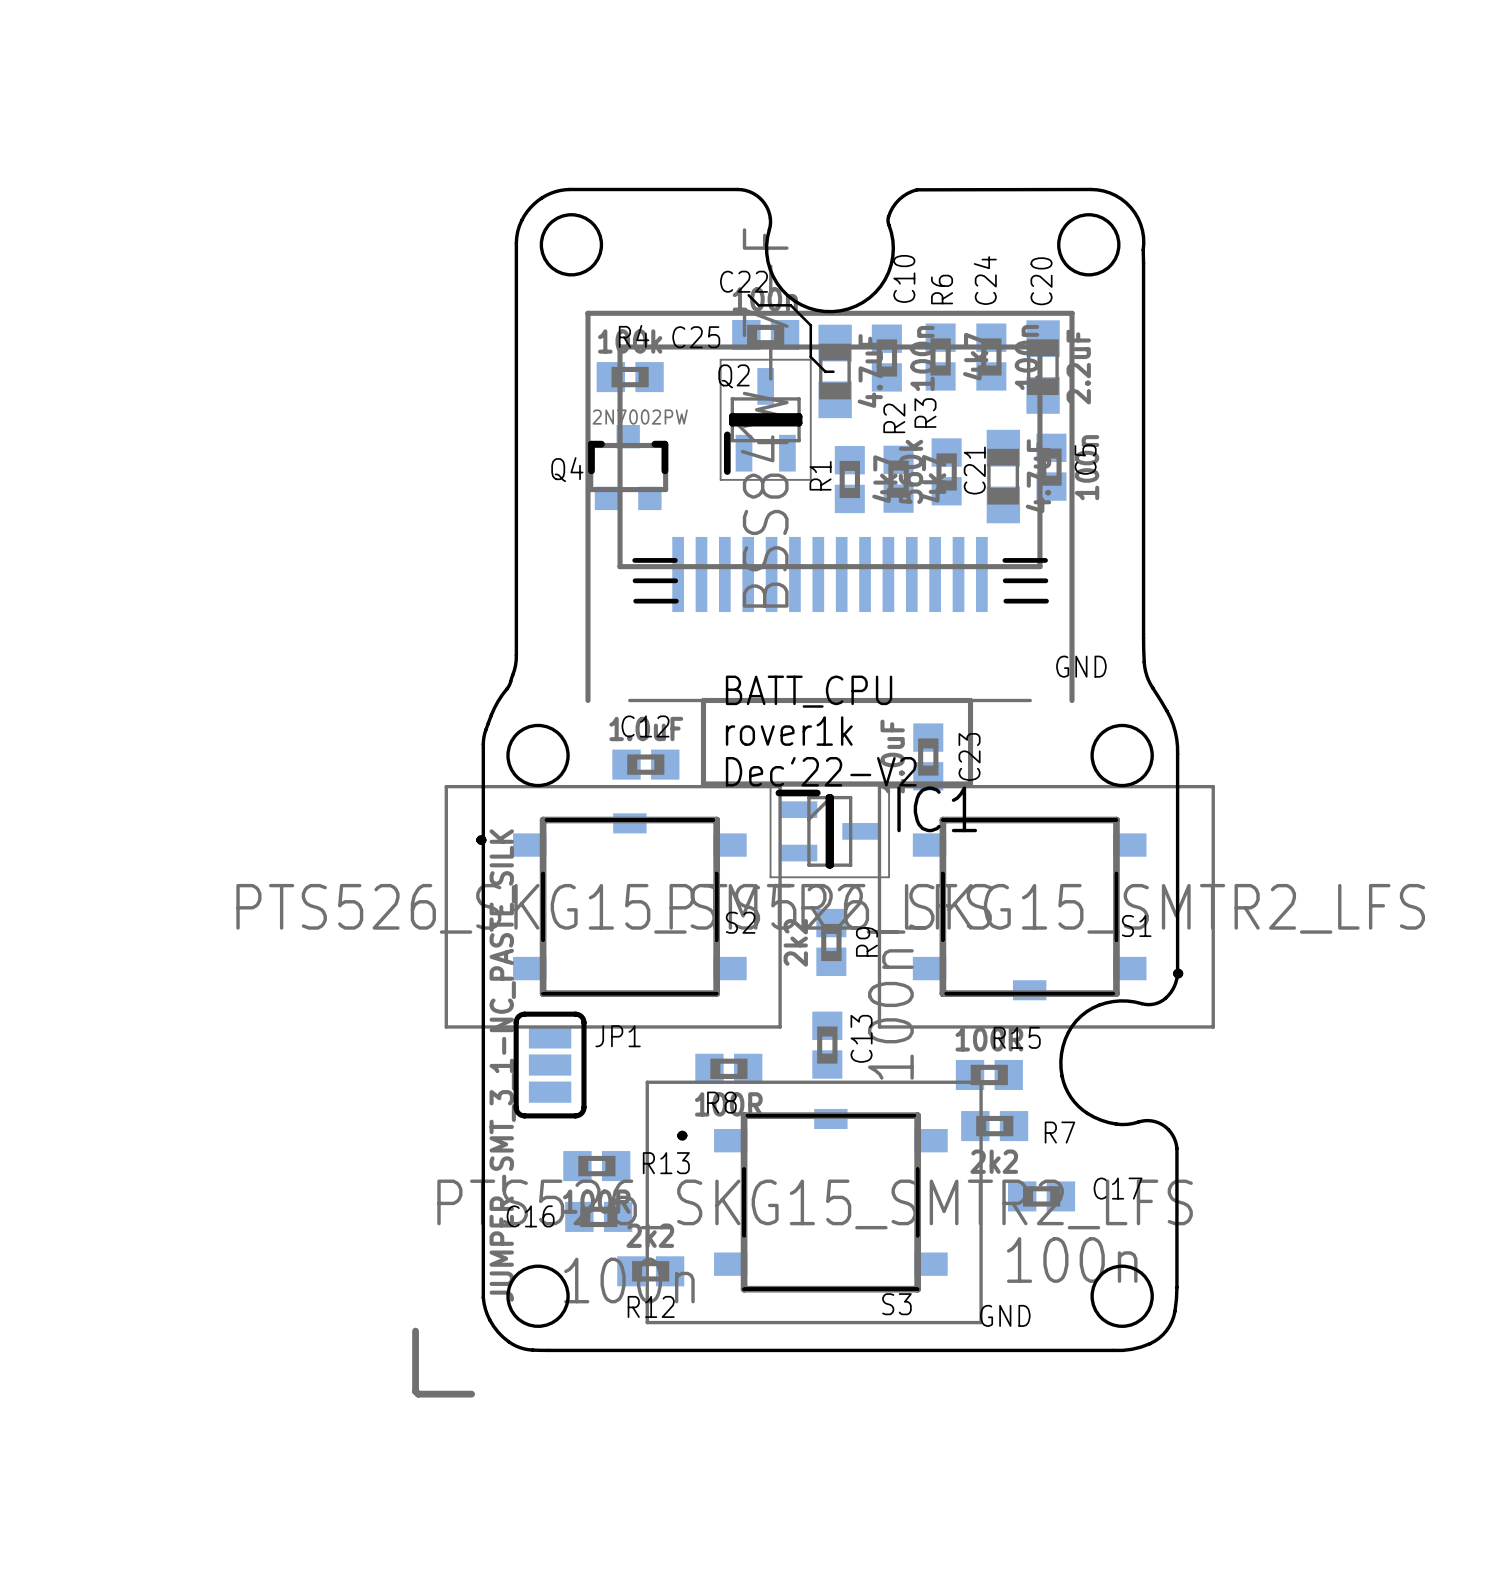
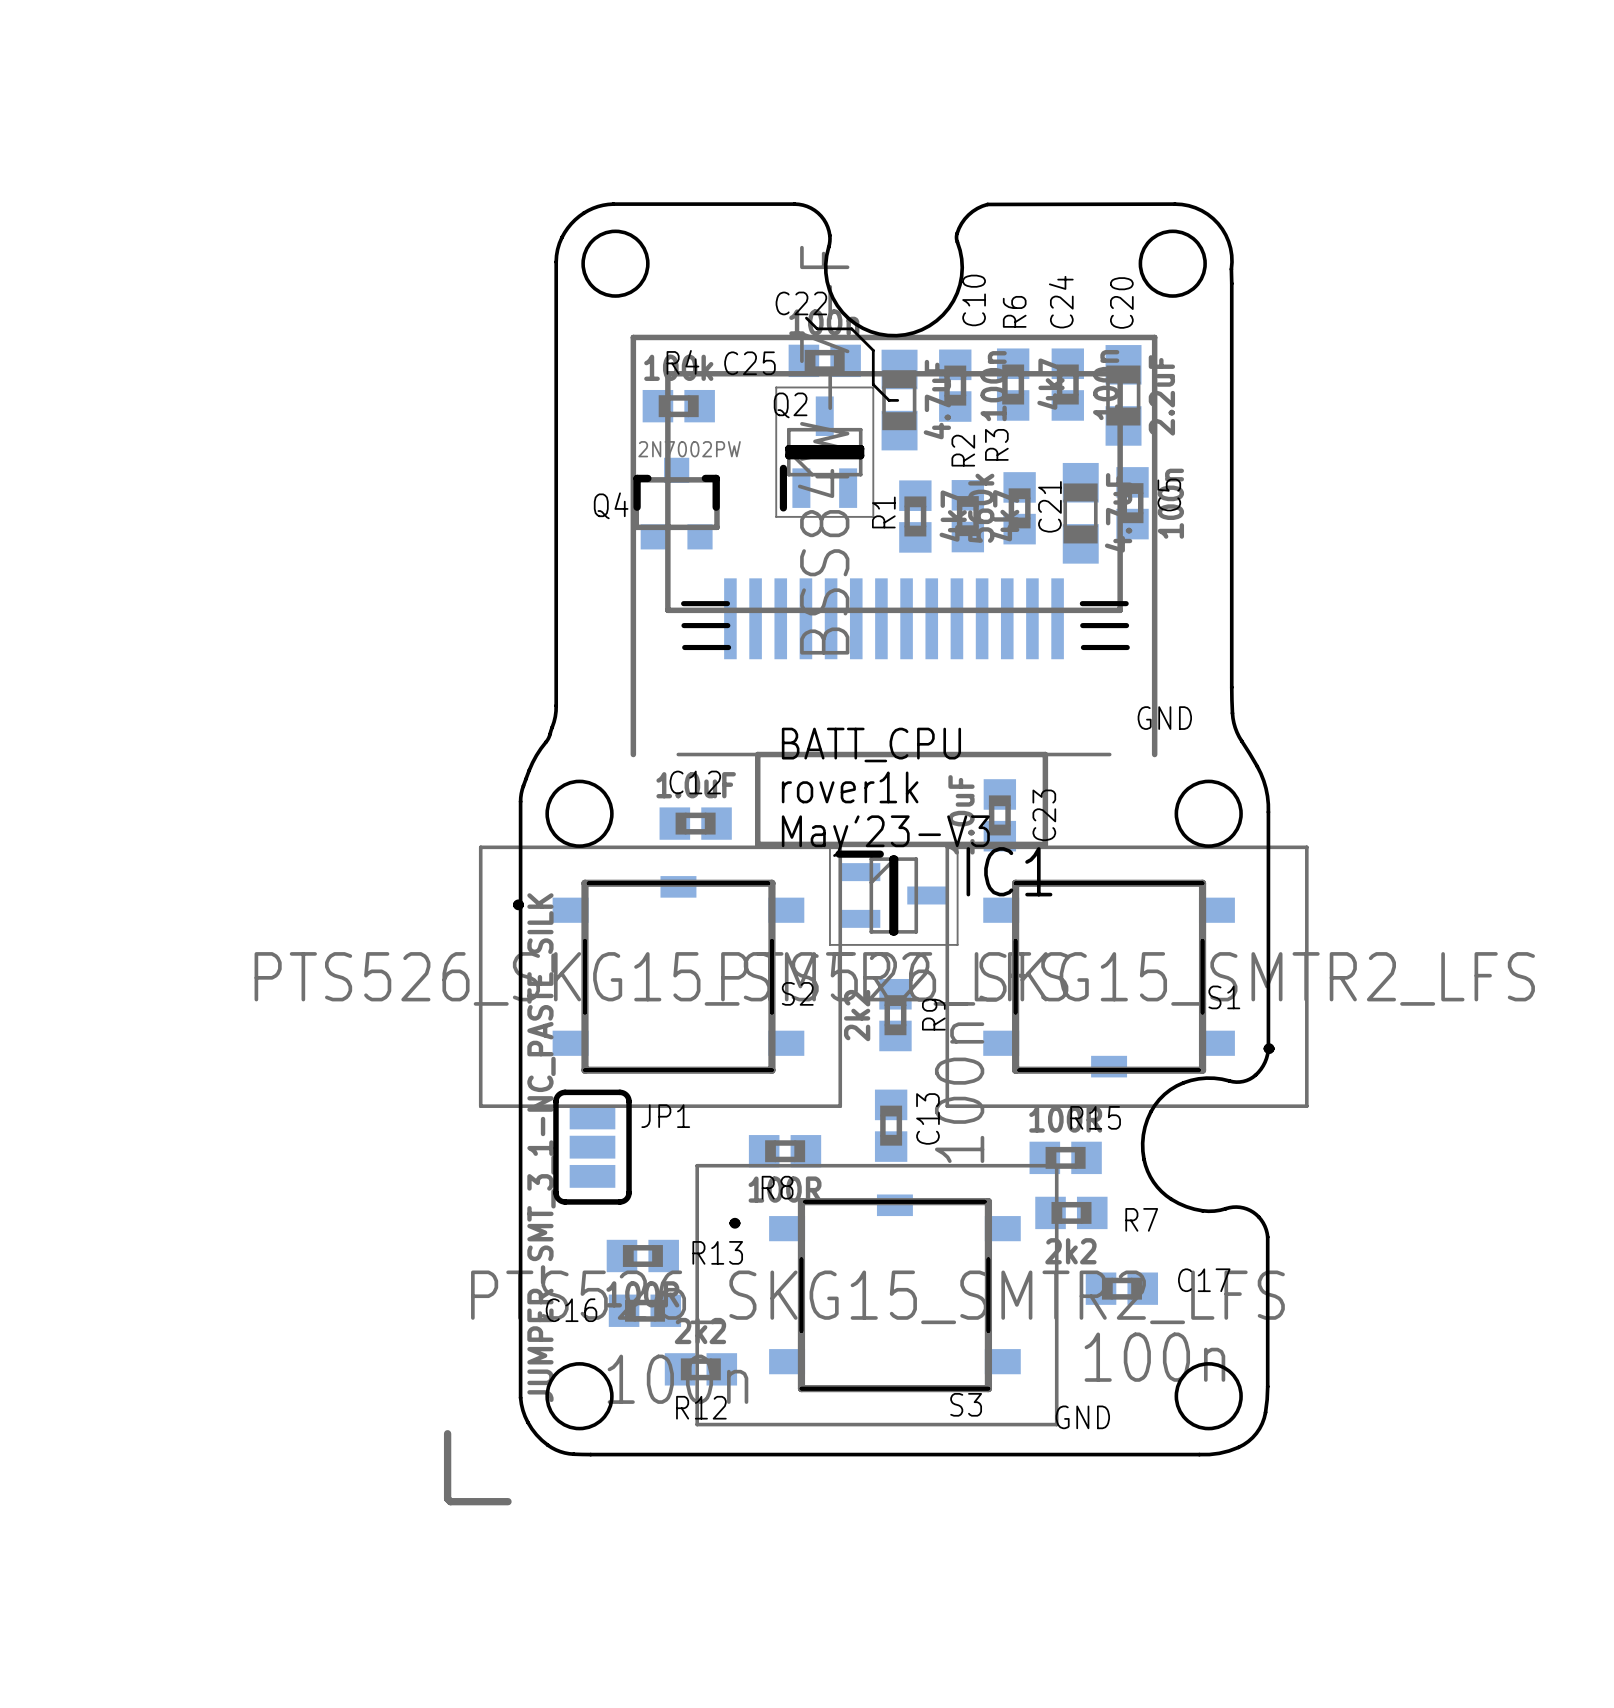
text: Dec'22-V2 (821, 771) -> May'23-V3 (885, 836)

